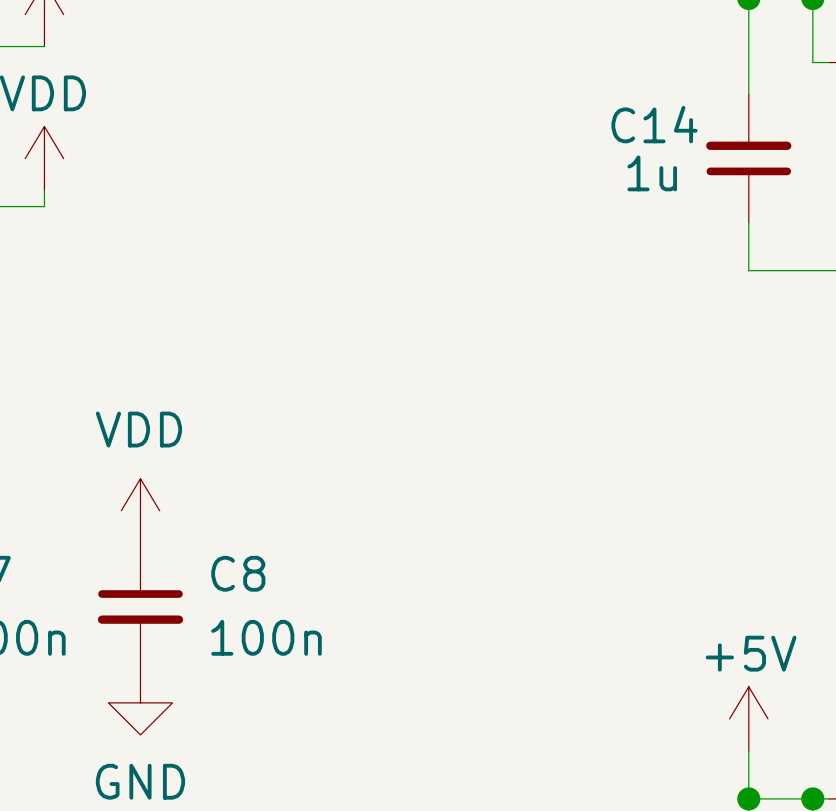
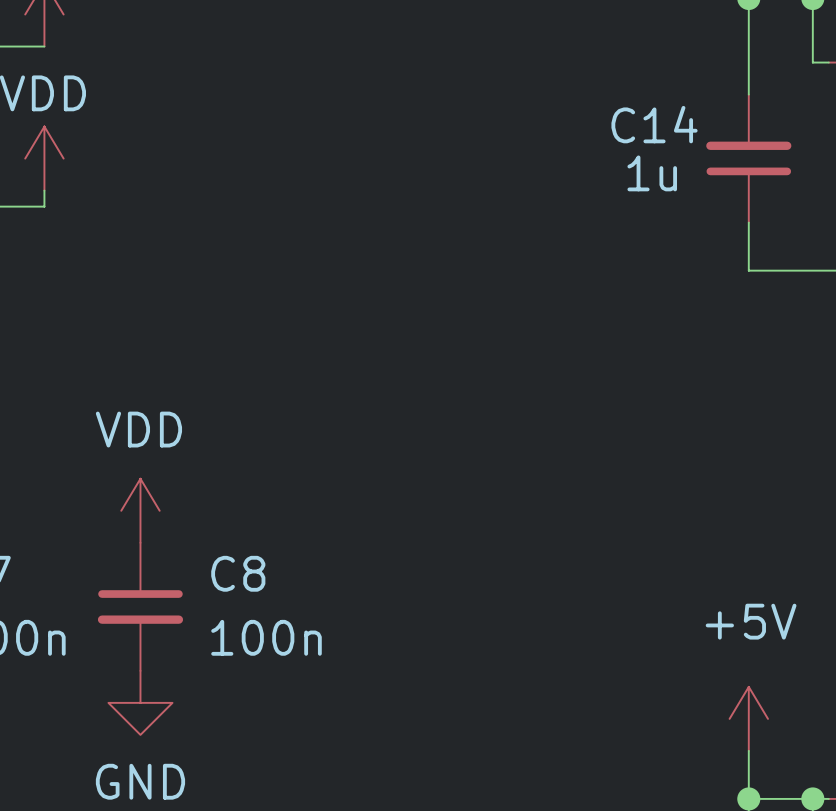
power symbol text position: +5V (751, 653) -> +5V (751, 621)

